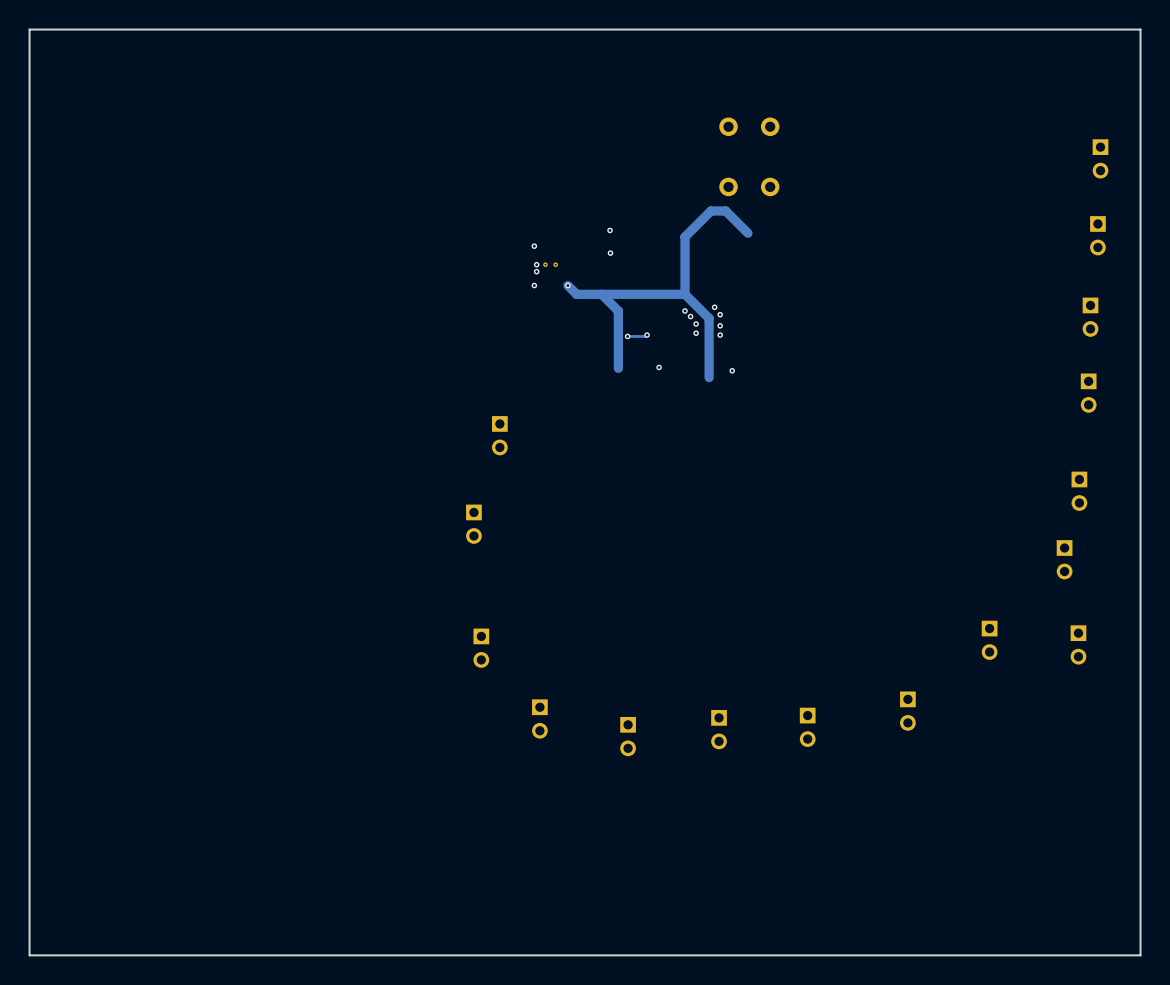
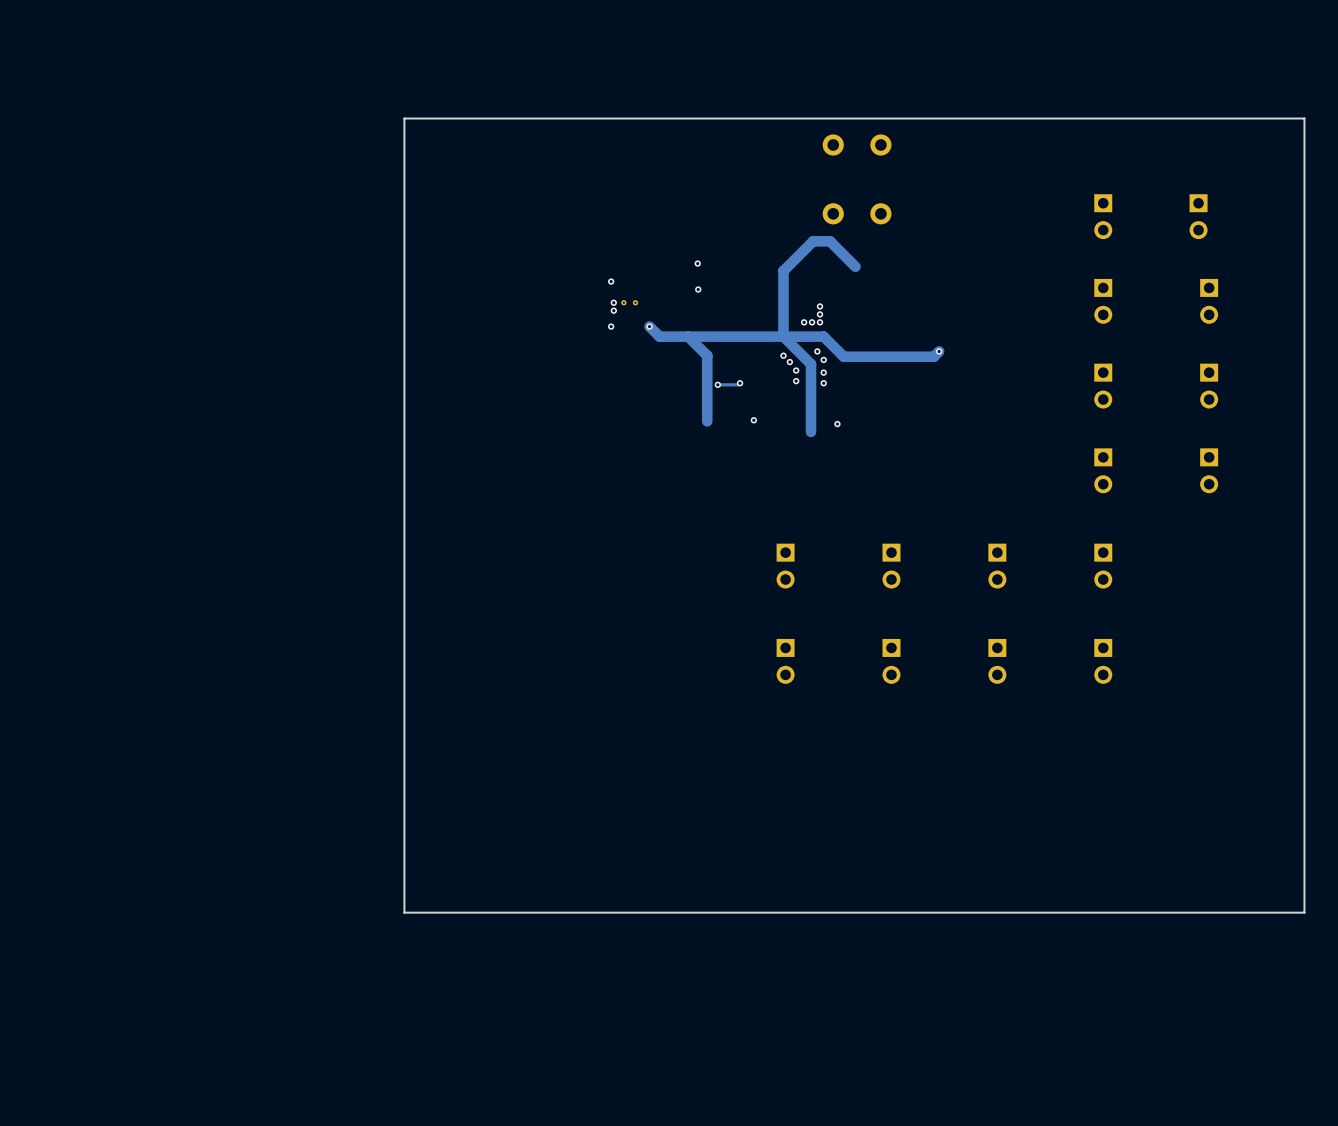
board edge: (1140, 103) (1140, 29) (29, 29) (29, 955) (1140, 955) (1140, 797) -> (1304, 118) (404, 118) (404, 912) (1304, 912)
part: (1100, 158) -> none
part: none -> (1103, 216)
part: none -> (1198, 216)
part: (1097, 235) -> none
part: none -> (1103, 301)
part: none -> (1209, 301)
via: none -> (820, 306)
via: none -> (820, 314)
via: none -> (804, 322)
via: none -> (812, 322)
via: none -> (820, 322)
track: none -> (783, 336) (823, 336) (843, 356) (933, 356) (939, 351)
via: none -> (939, 351)
part: (1090, 317) -> none
part: none -> (1103, 386)
part: none -> (1209, 386)
part: (1088, 393) -> none
part: none -> (1103, 470)
part: none -> (1209, 470)
part: (499, 435) -> none
part: (1079, 491) -> none
part: none -> (785, 566)
part: none -> (891, 566)
part: none -> (997, 566)
part: none -> (1103, 566)
part: (473, 524) -> none
part: (1064, 559) -> none
part: none -> (785, 661)
part: none -> (891, 661)
part: none -> (997, 661)
part: none -> (1103, 661)
part: (989, 640) -> none
part: (1078, 644) -> none
part: (481, 648) -> none
part: (907, 711) -> none
part: (539, 719) -> none
part: (807, 727) -> none
part: (719, 729) -> none
part: (628, 736) -> none

